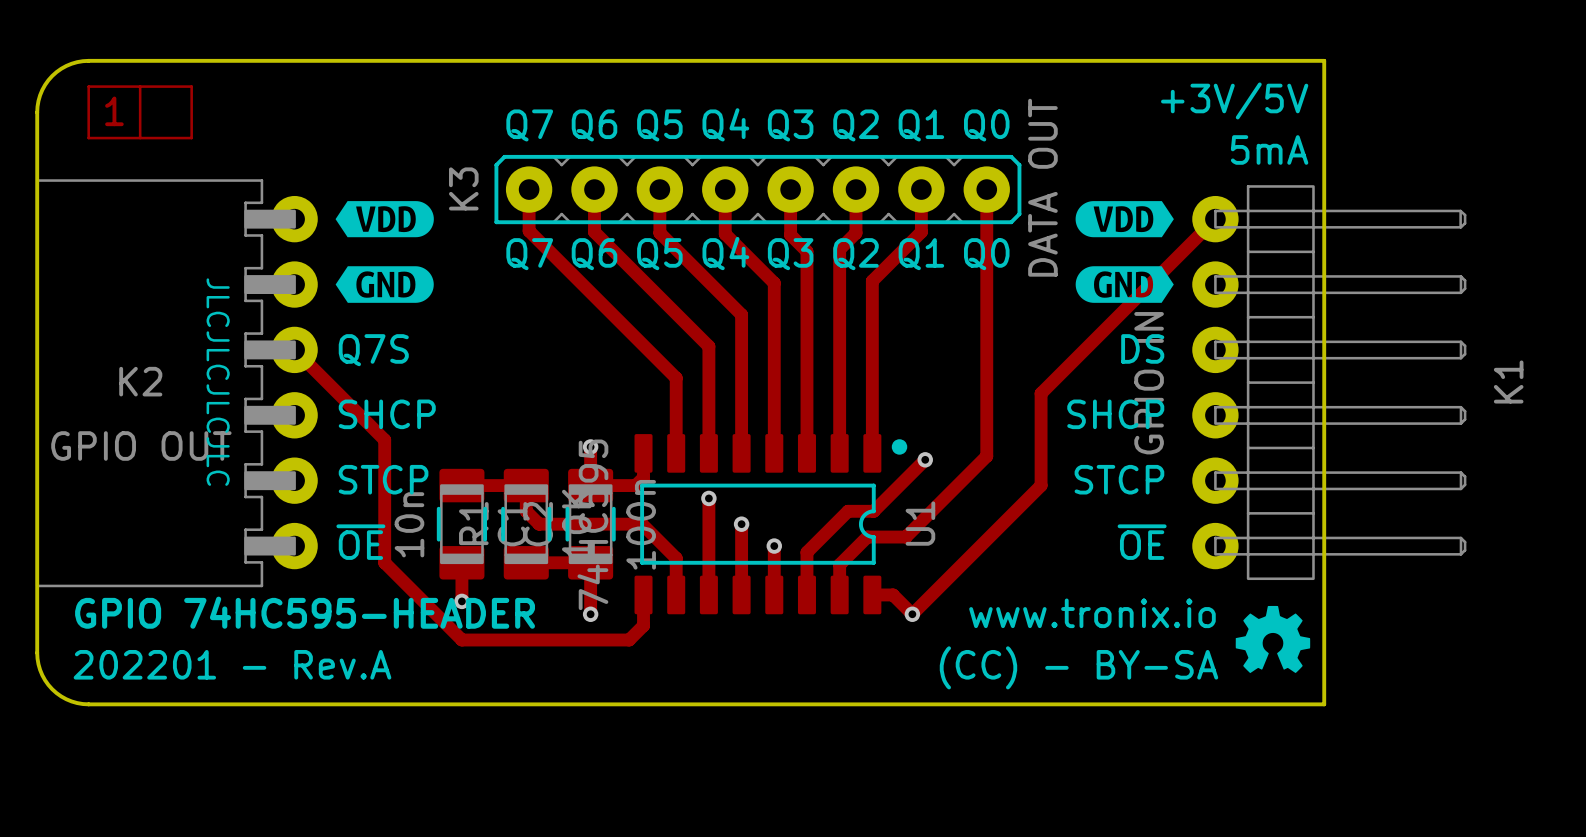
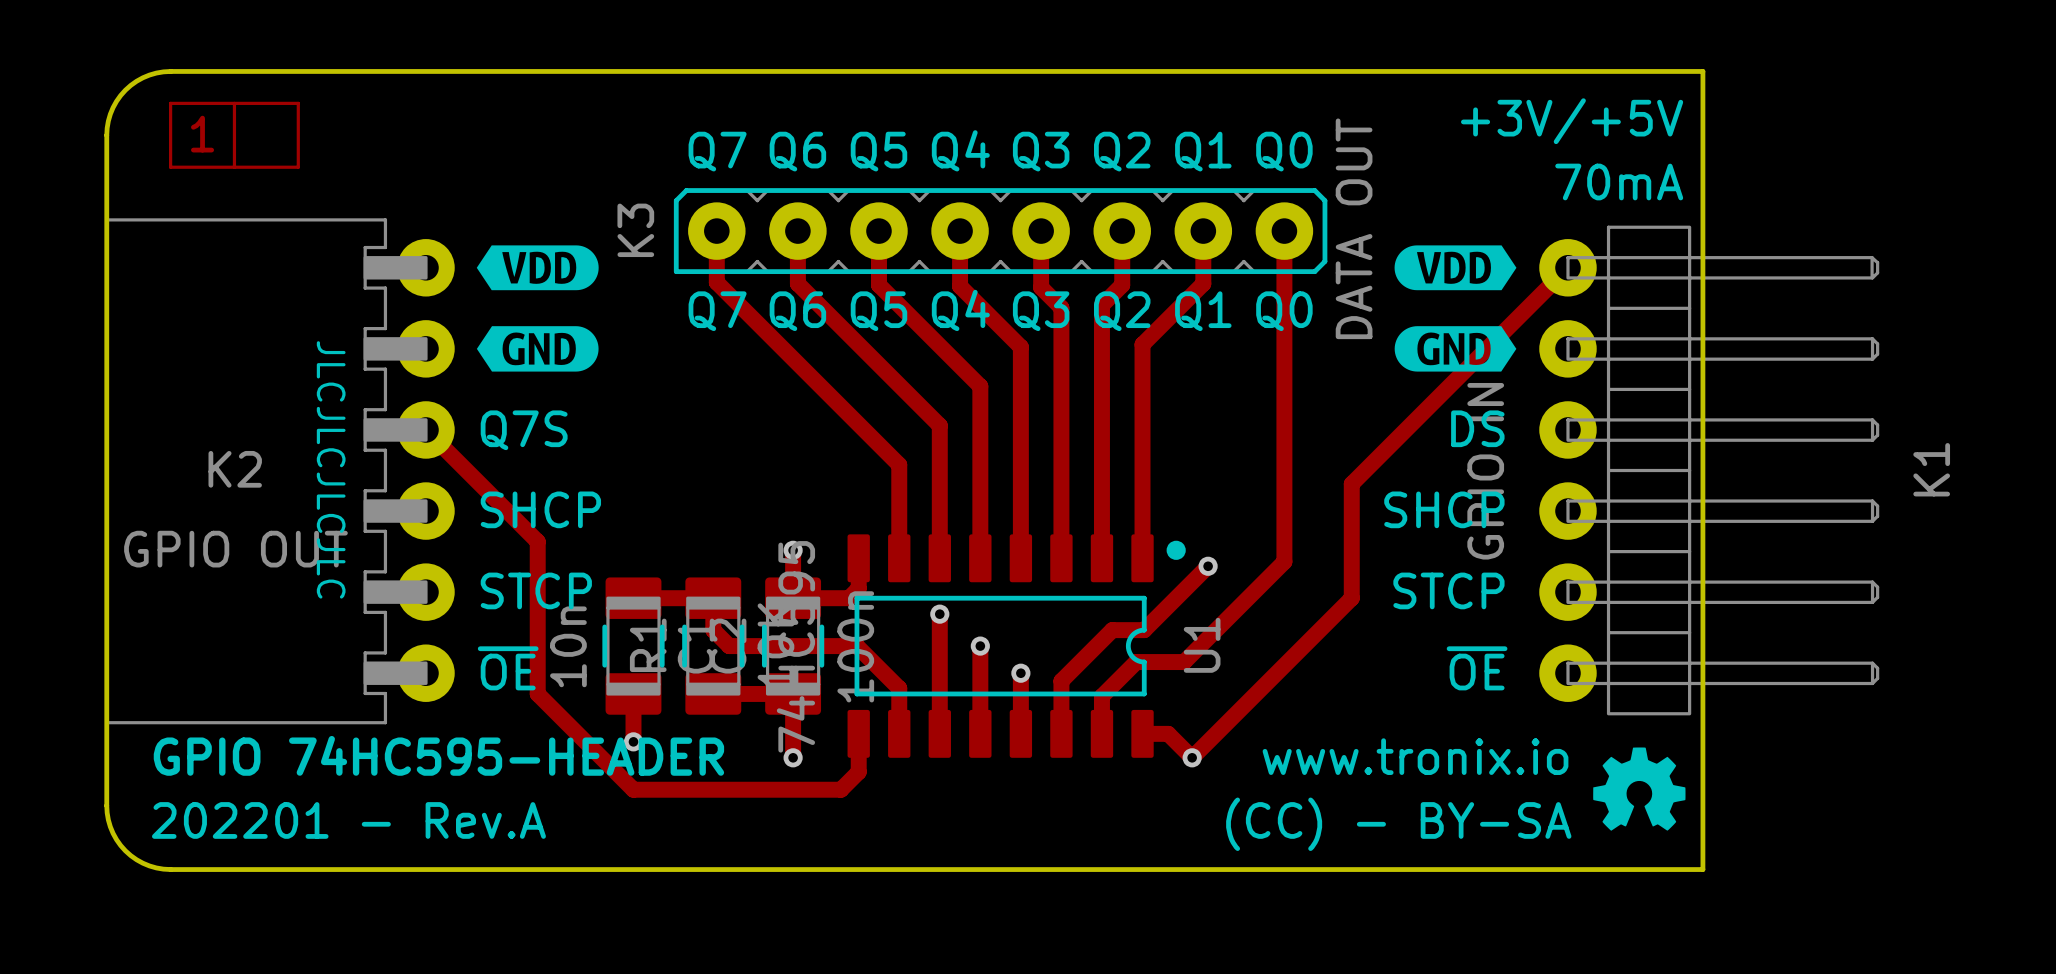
text: +3V/5V (1234, 100) -> +3V/+5V (1572, 121)
text: 5mA (1269, 149) -> 70mA (1619, 182)

